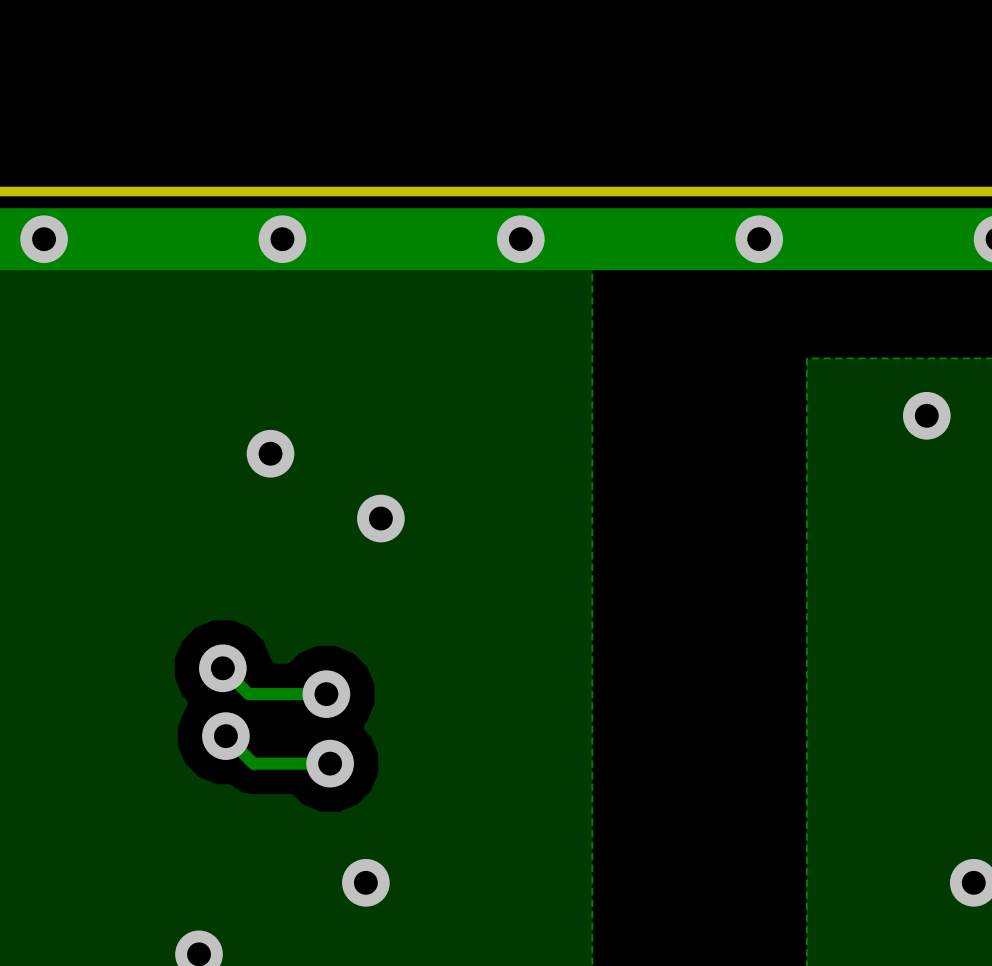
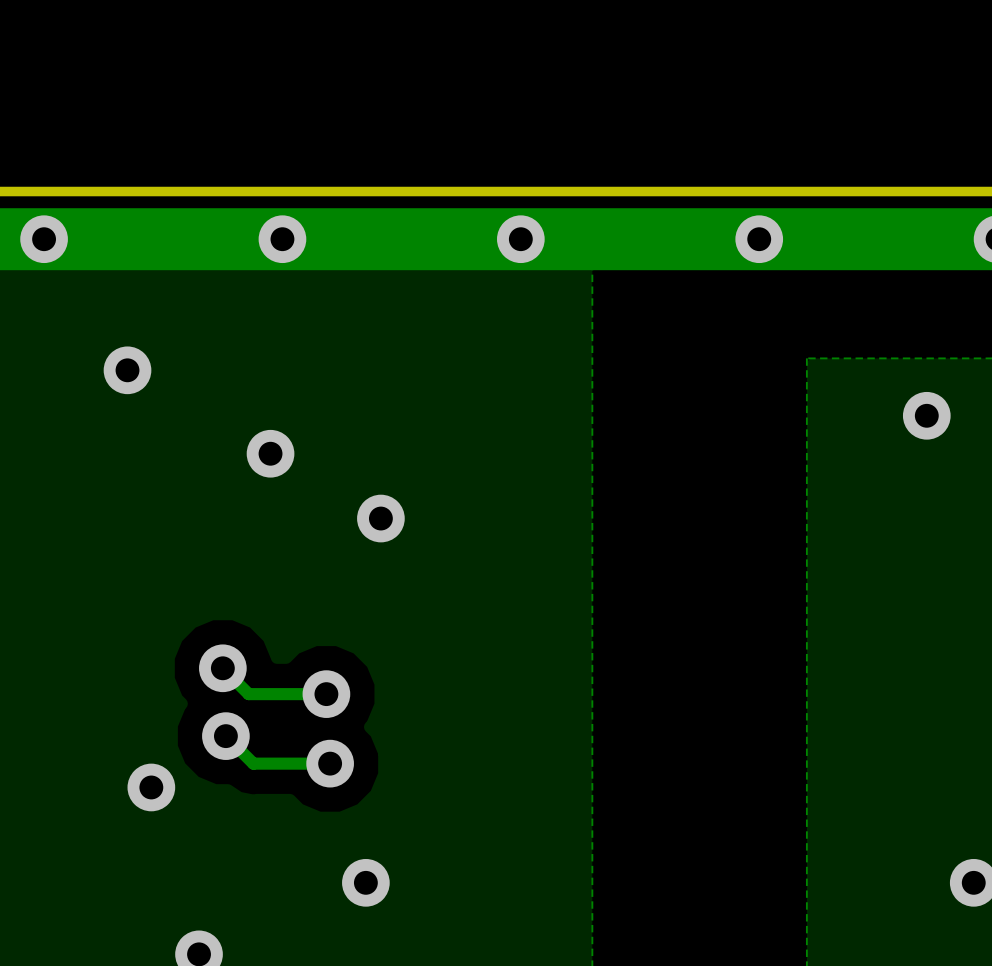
via: none -> (127, 370)
via: none -> (151, 787)

